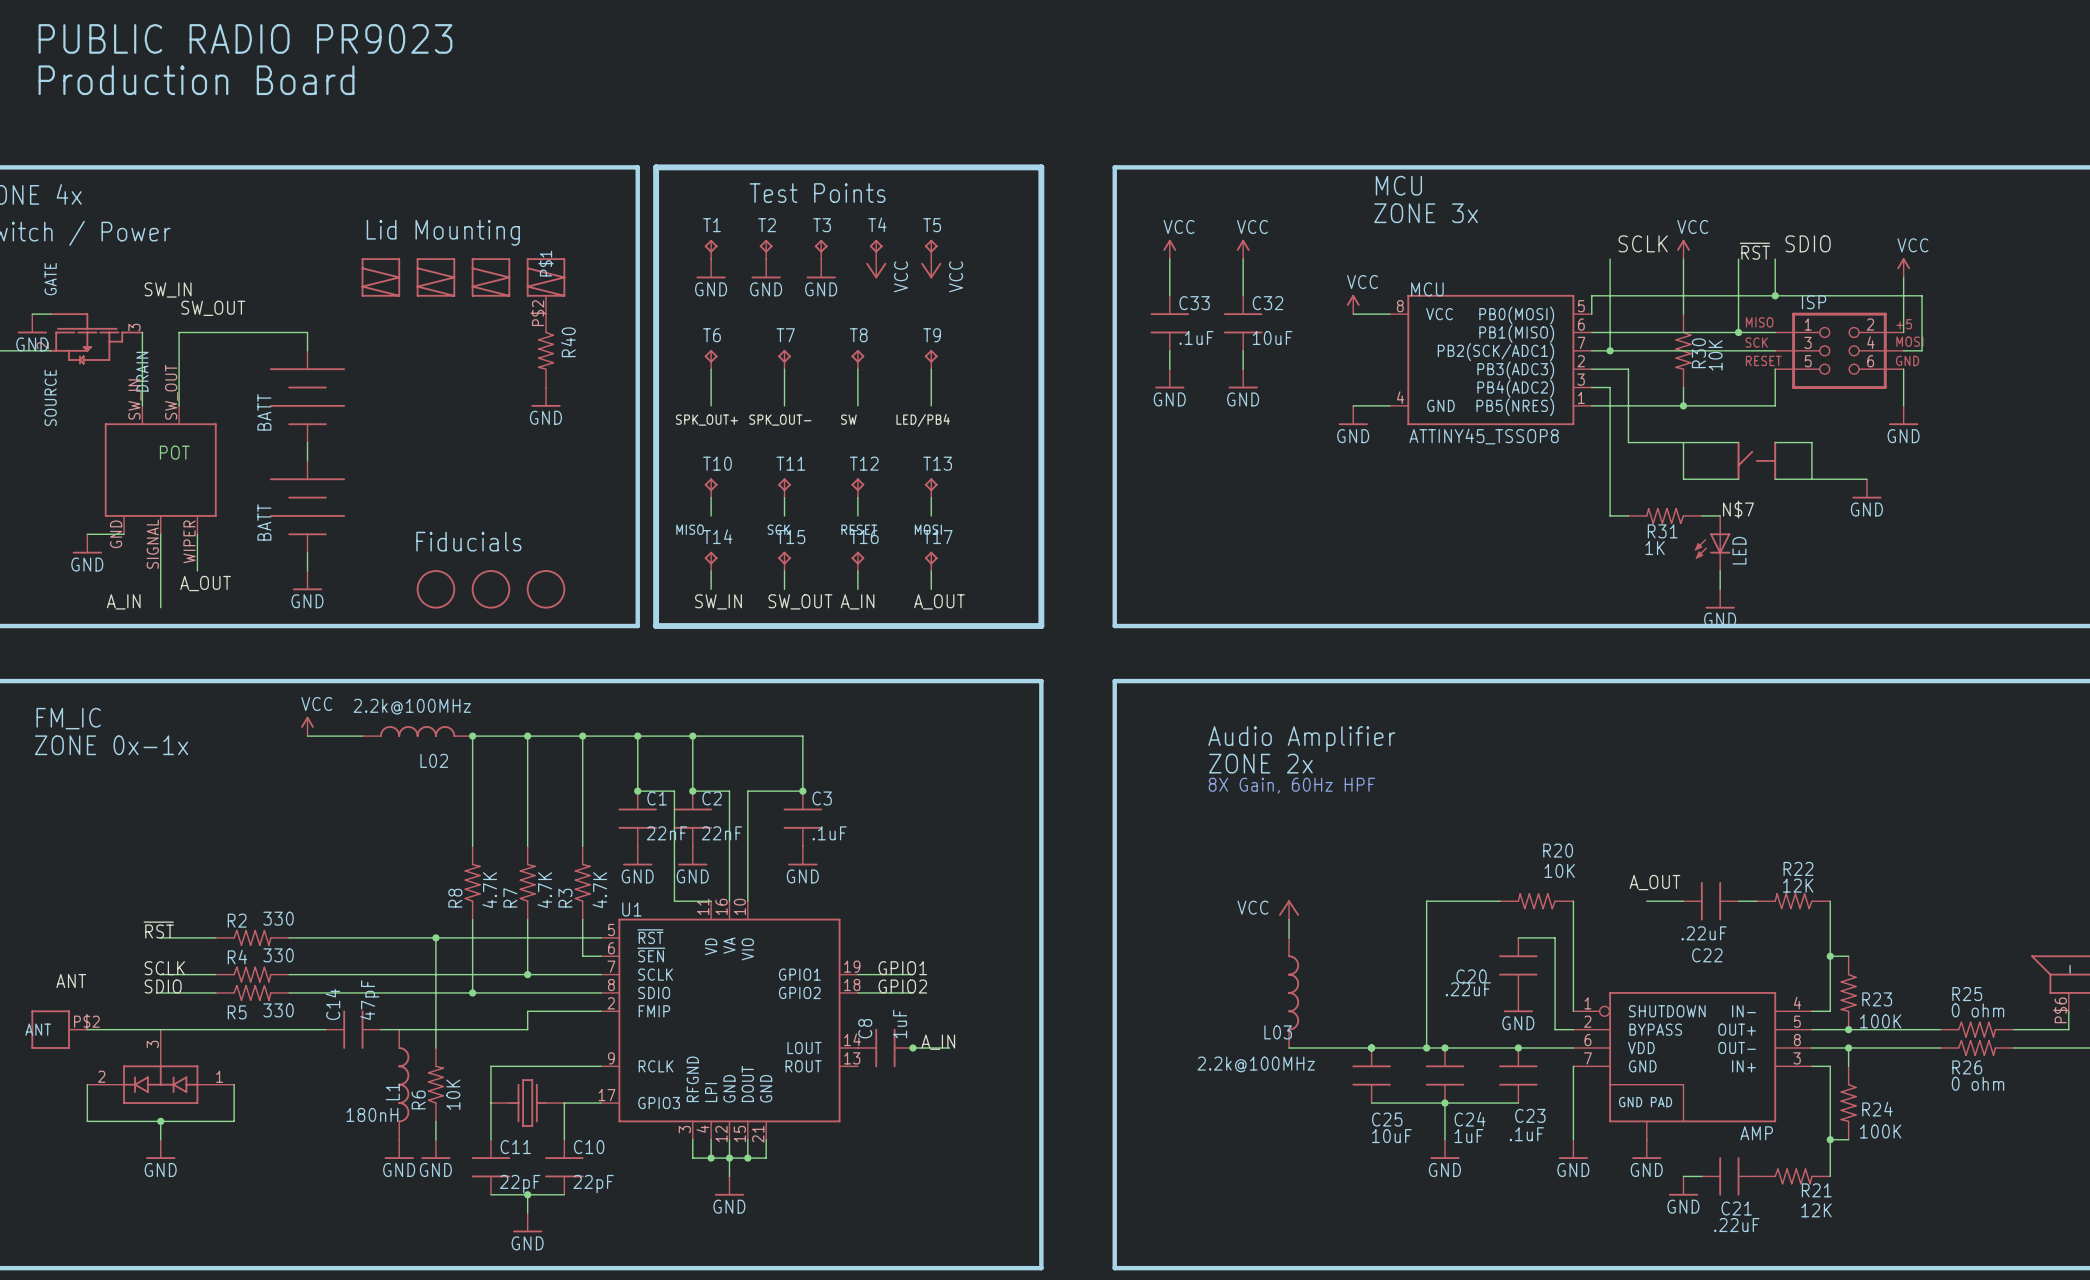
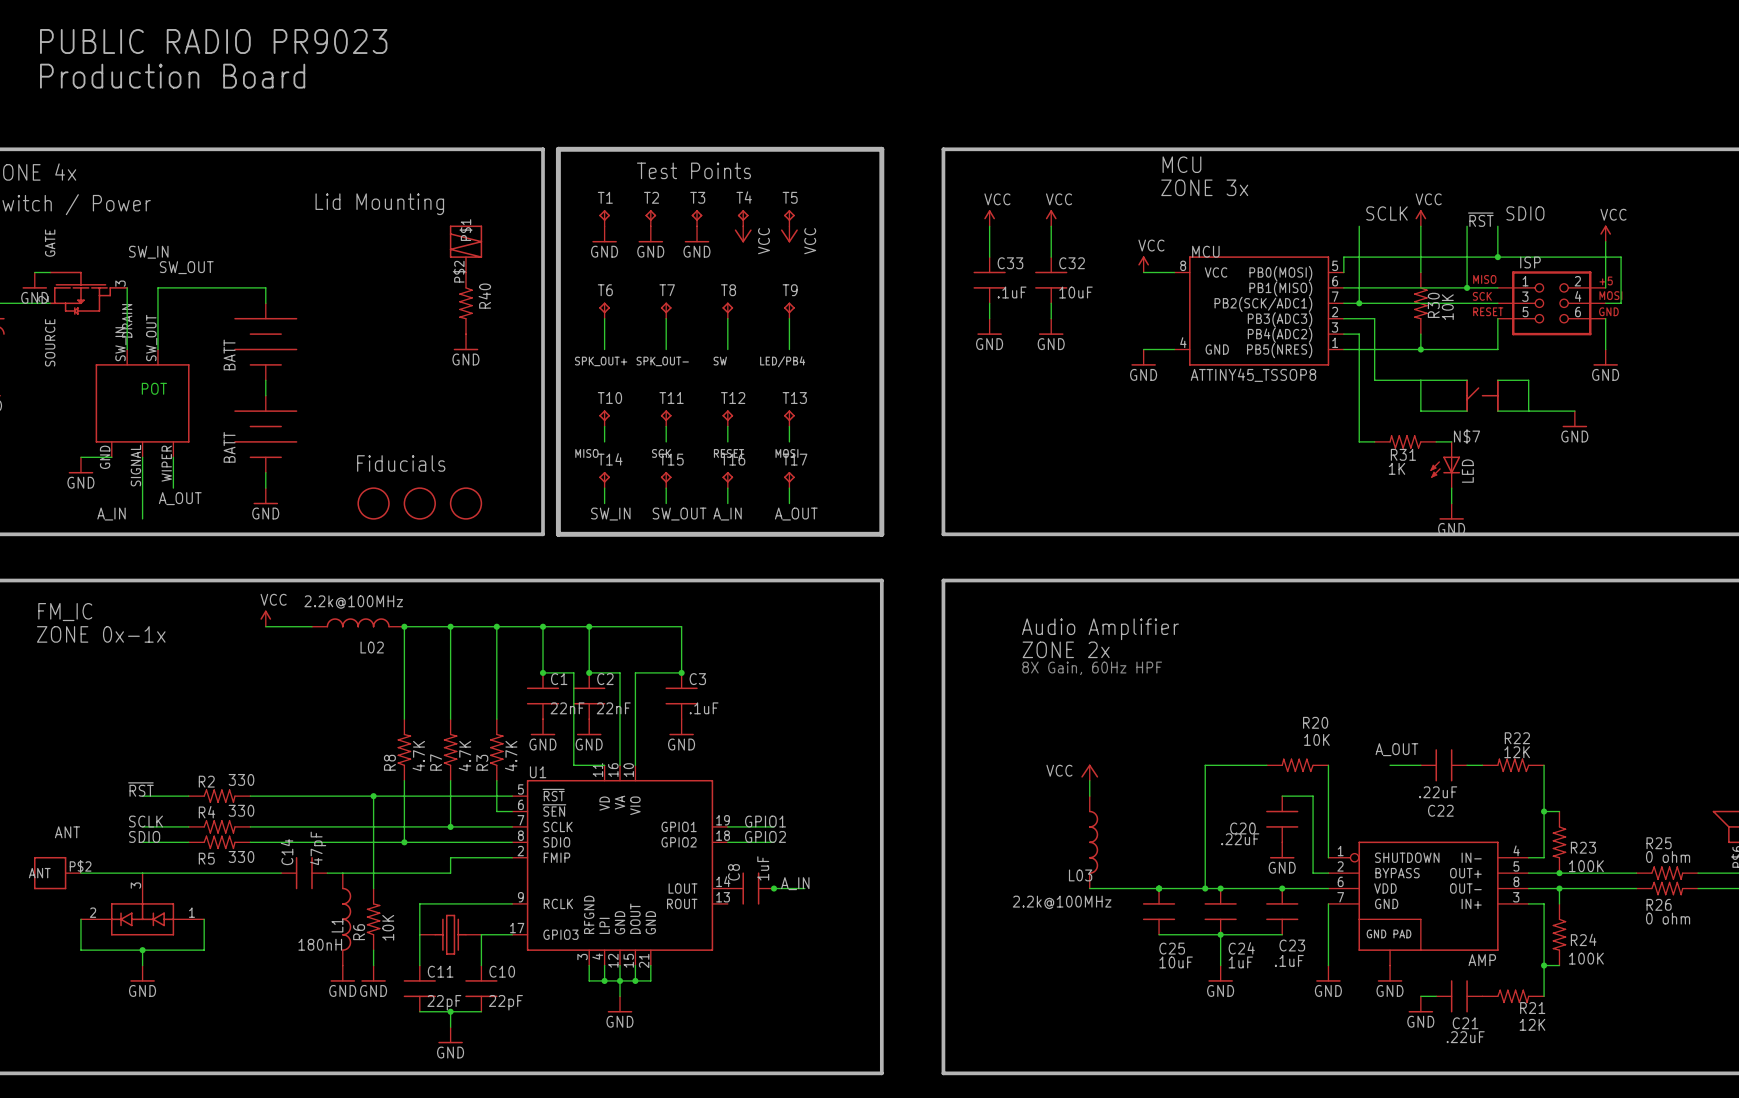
part: (380, 277) -> none
part: (435, 277) -> none
part: (490, 277) -> none

